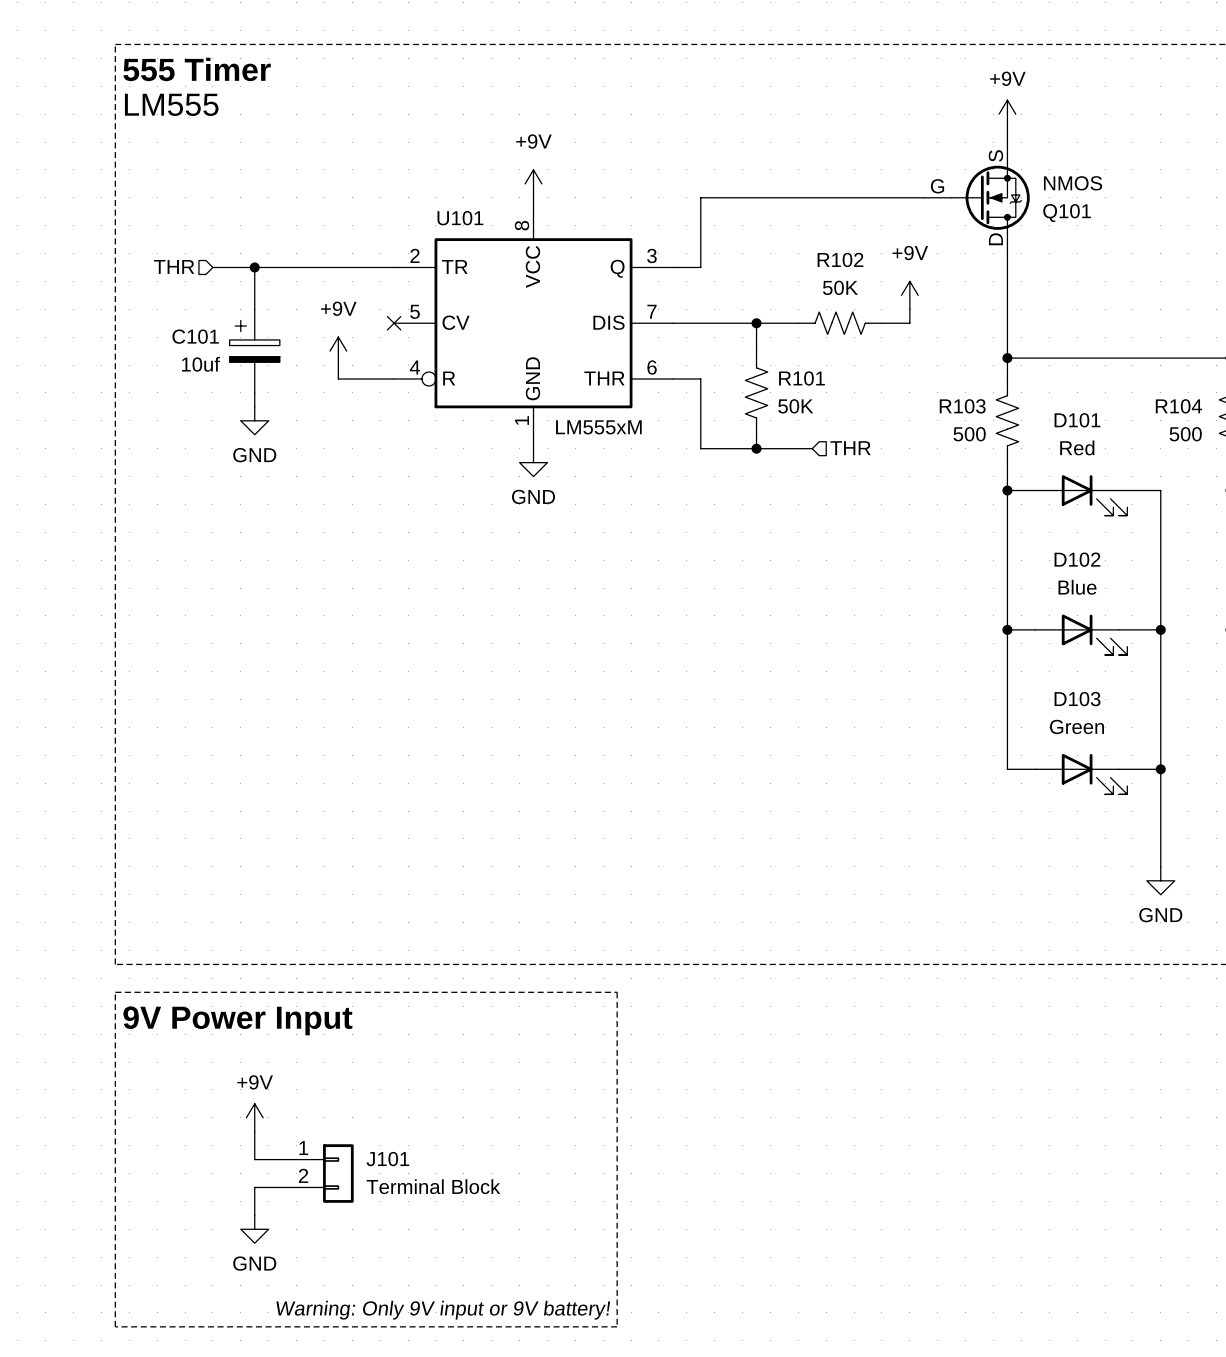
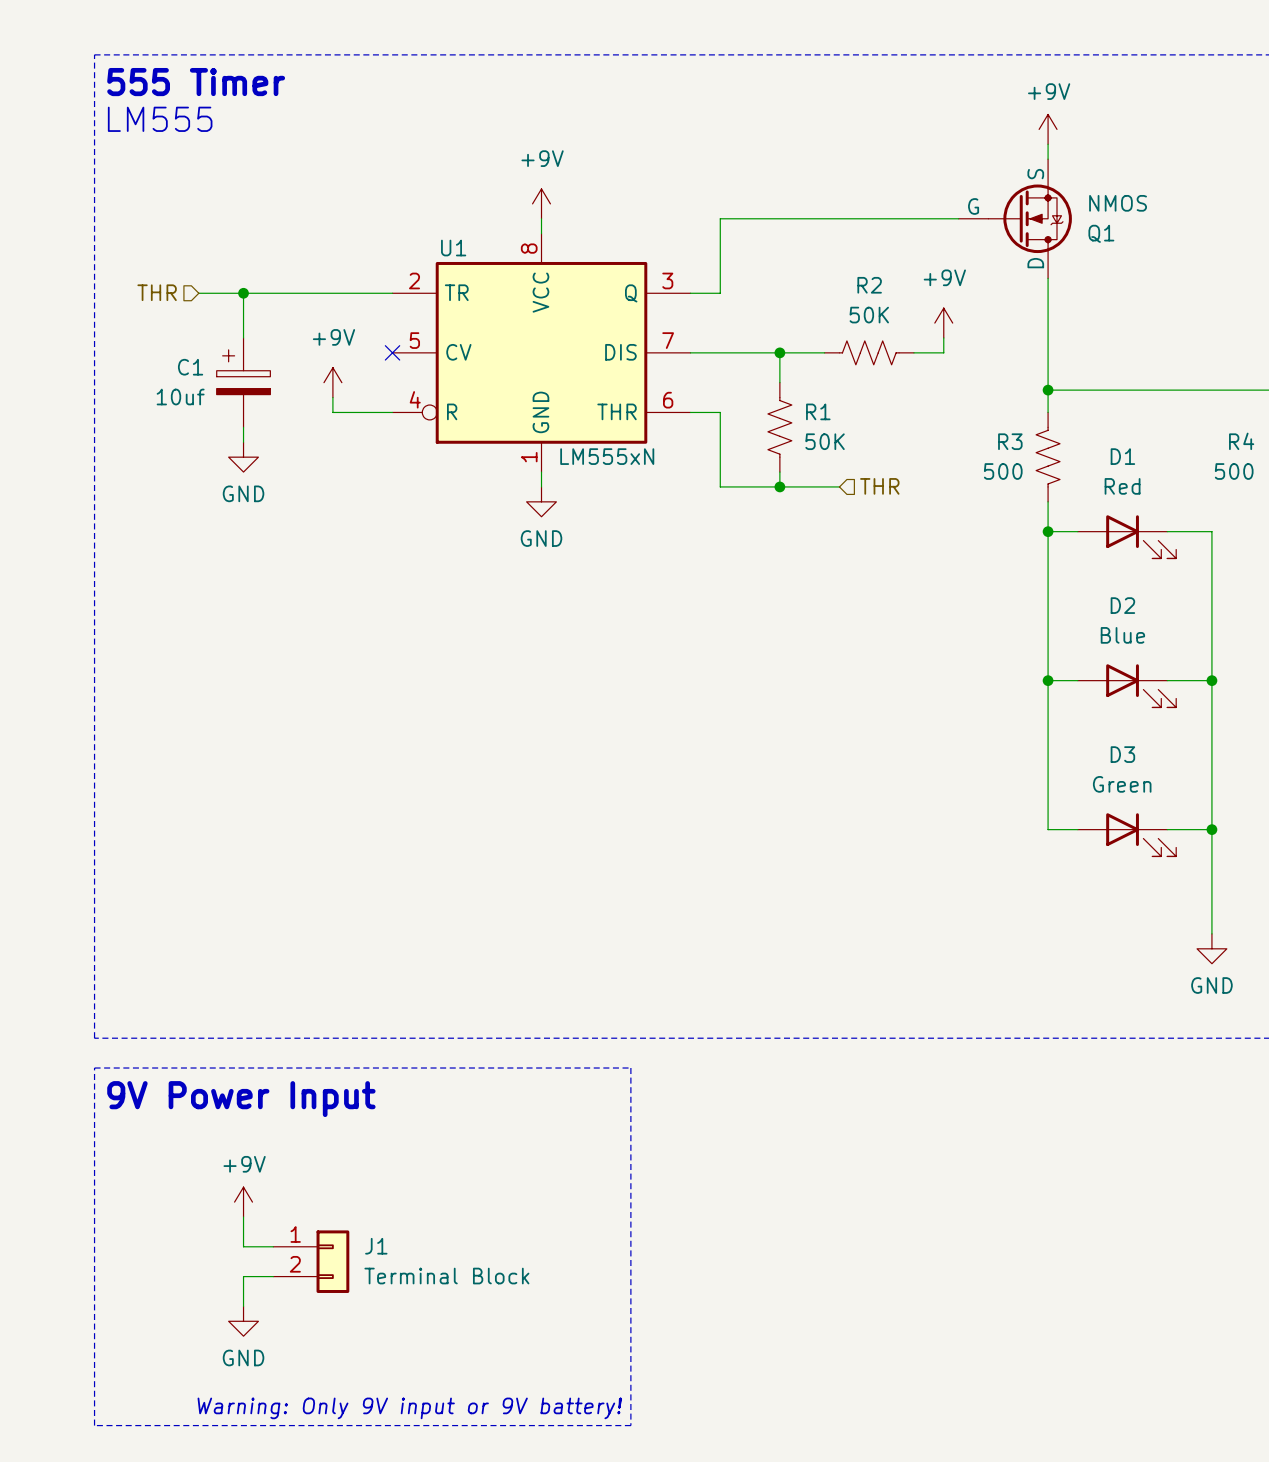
Q101 name: Q101 (1067, 213) -> Q1 (1101, 233)
U101 name: U101 (460, 218) -> U1 (453, 248)
R102 name: R102 (840, 259) -> R2 (869, 285)
C101 name: C101 (195, 336) -> C1 (190, 367)
R101 name: R101 (802, 378) -> R1 (818, 411)
R103 name: R103 (962, 406) -> R3 (1010, 441)
R104 name: R104 (1178, 406) -> R4 (1241, 441)
D101 name: D101 (1077, 420) -> D1 (1122, 456)
U101 value: LM555xM (598, 427) -> LM555xN (607, 456)
D102 name: D102 (1077, 559) -> D2 (1122, 605)
D103 name: D103 (1077, 699) -> D3 (1122, 754)
J101 name: J101 (387, 1159) -> J1 (376, 1246)

